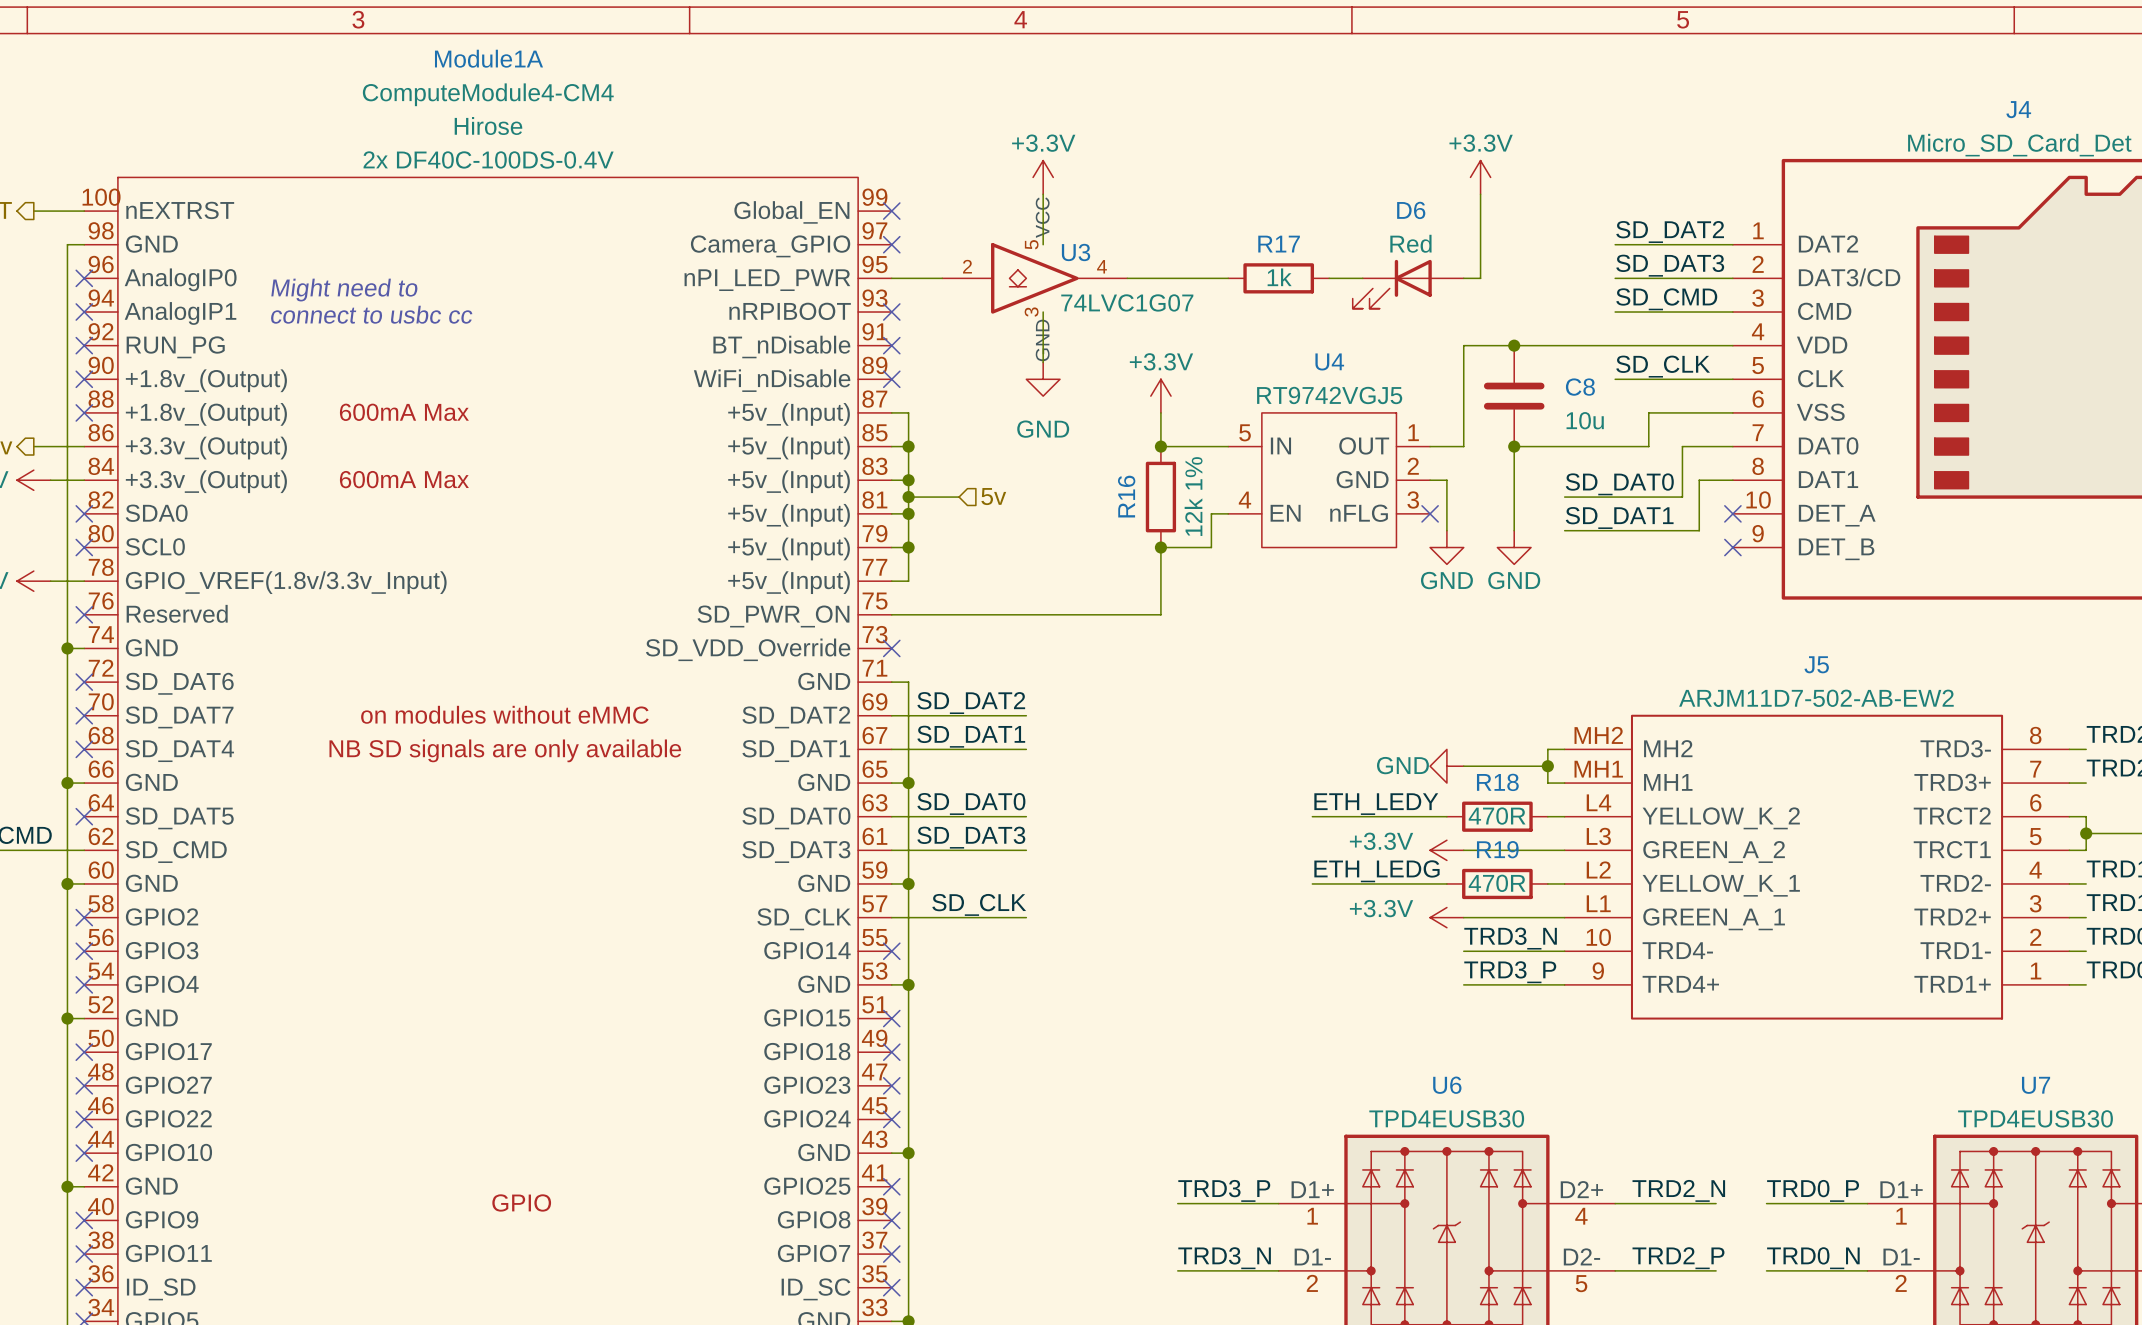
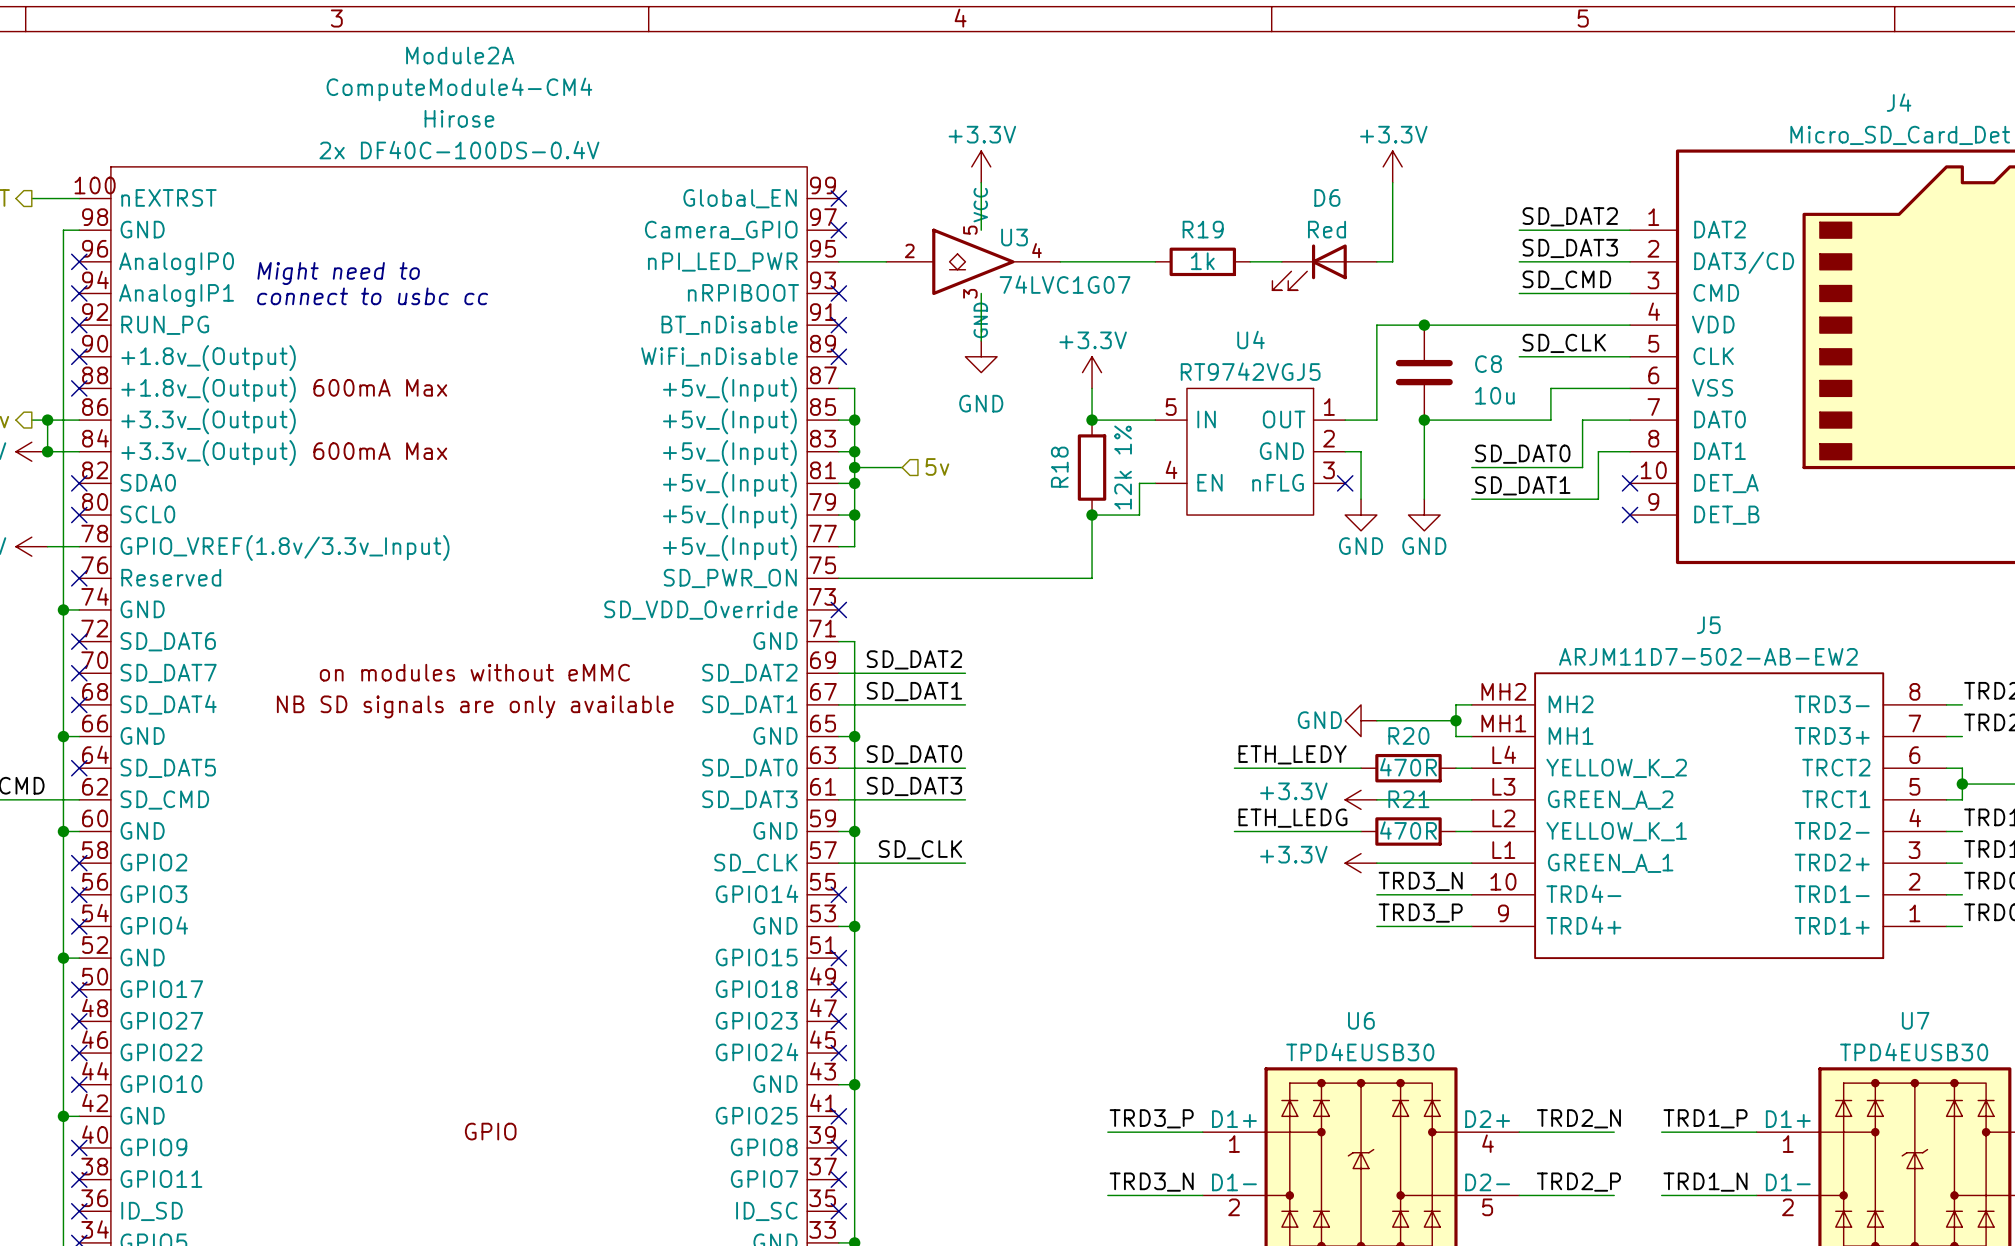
Module1A name: Module1A (489, 58) -> Module2A (460, 55)
R17 name: R17 (1279, 244) -> R19 (1203, 229)
wire: none -> (47, 420) (47, 451)
junction: none -> (47, 420)
junction: none -> (47, 451)
R16 name: R16 (1126, 496) -> R18 (1059, 467)
R18 name: R18 (1497, 782) -> R20 (1408, 735)
R19 name: R19 (1497, 849) -> R21 (1408, 799)
label: TRD0_P (1813, 1190) -> TRD1_P (1705, 1118)
label: TRD0_N (1813, 1258) -> TRD1_N (1705, 1182)

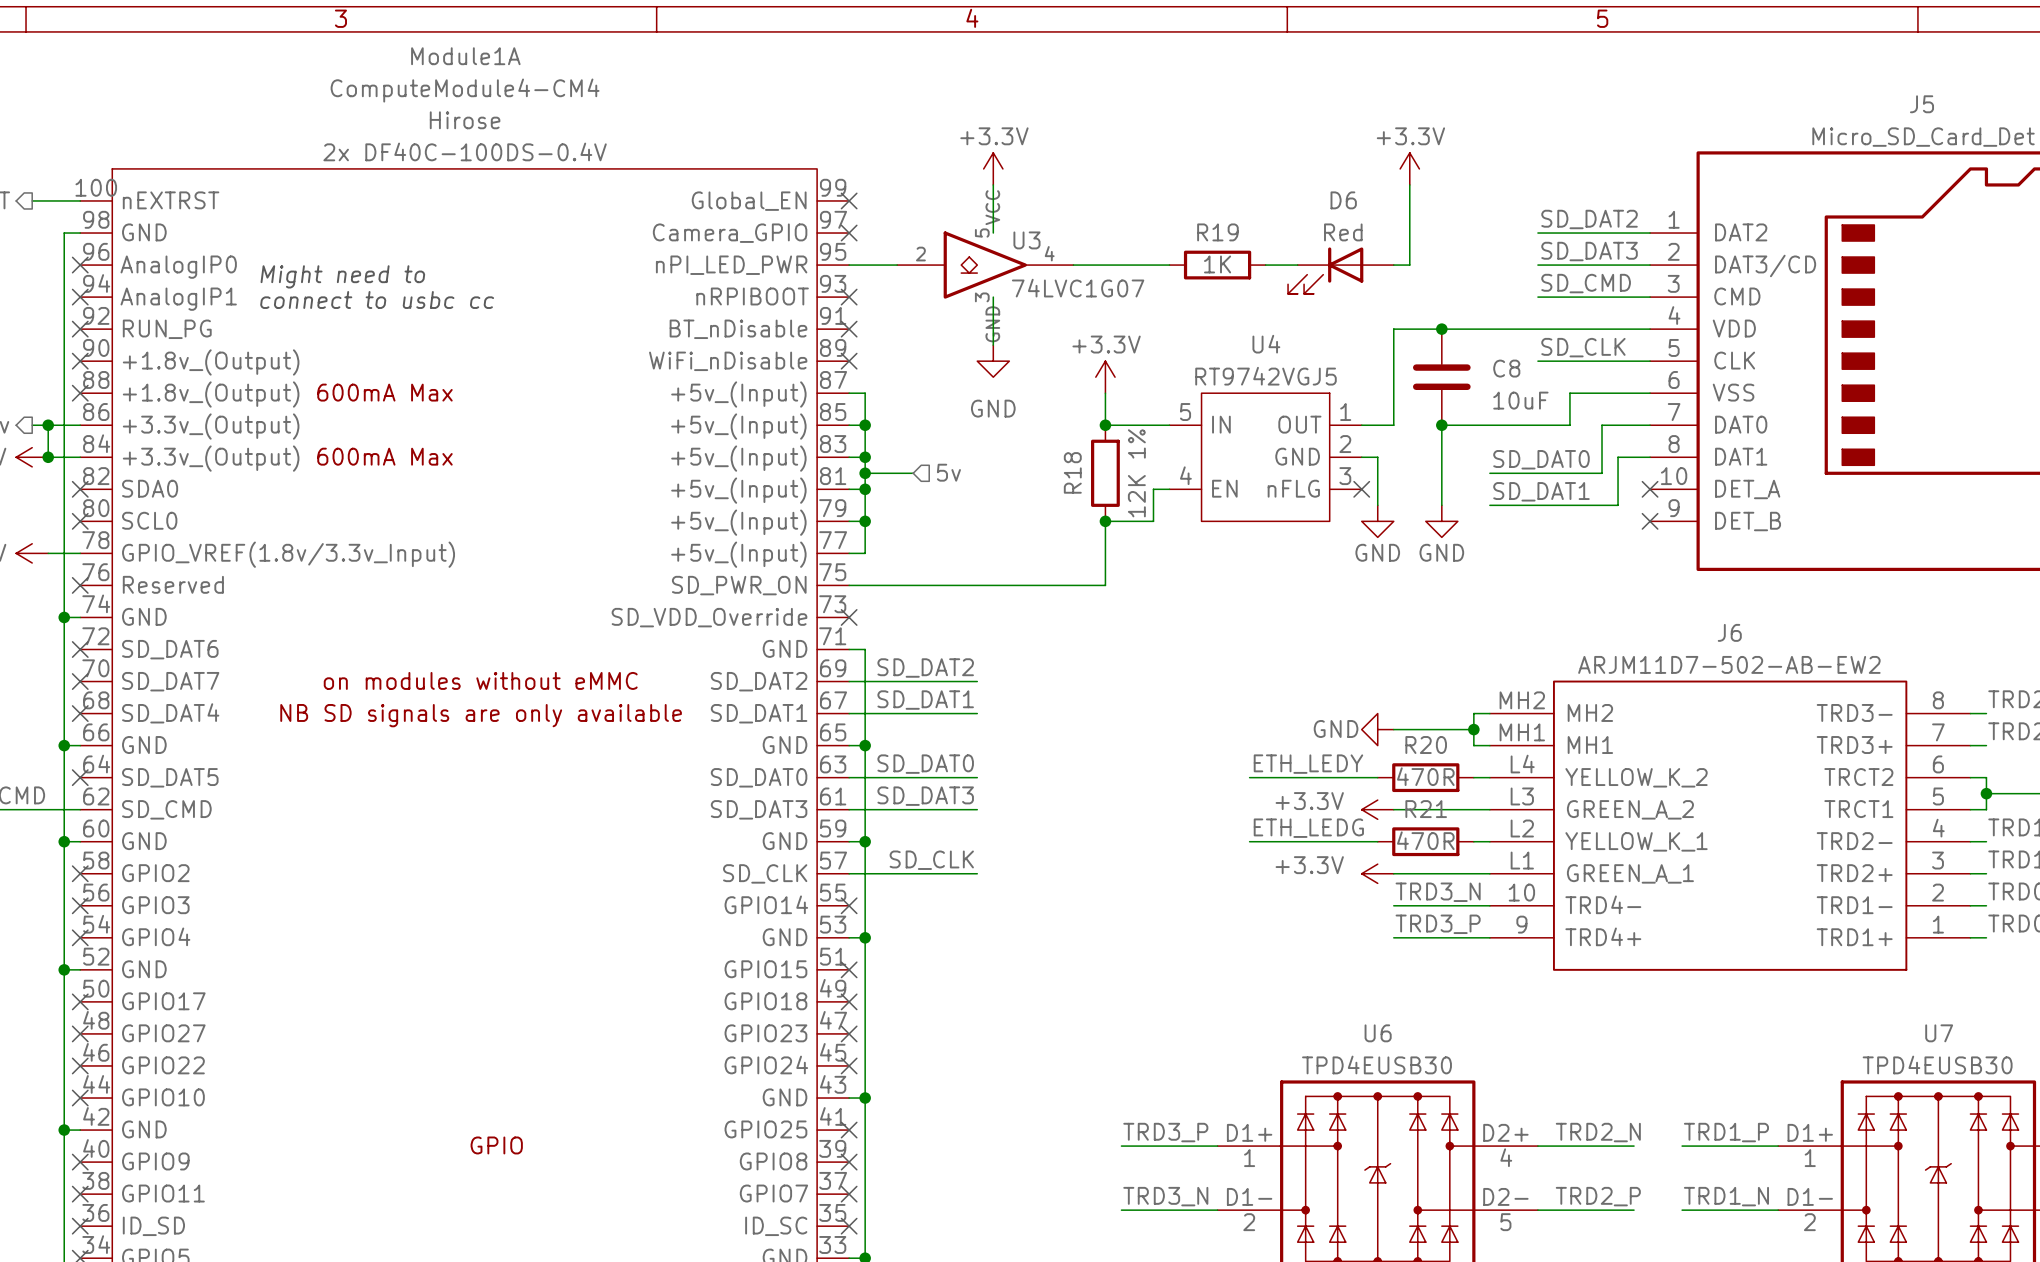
Module2A name: Module2A (460, 55) -> Module1A (465, 56)
J4 name: J4 (1899, 102) -> J5 (1921, 104)
R19 value: 1k (1202, 261) -> 1K (1217, 264)
C8 value: 10u (1494, 395) -> 10uF (1520, 400)
R18 value: 12k 1% (1123, 467) -> 12K 1% (1136, 473)
J5 name: J5 (1708, 625) -> J6 (1729, 632)

